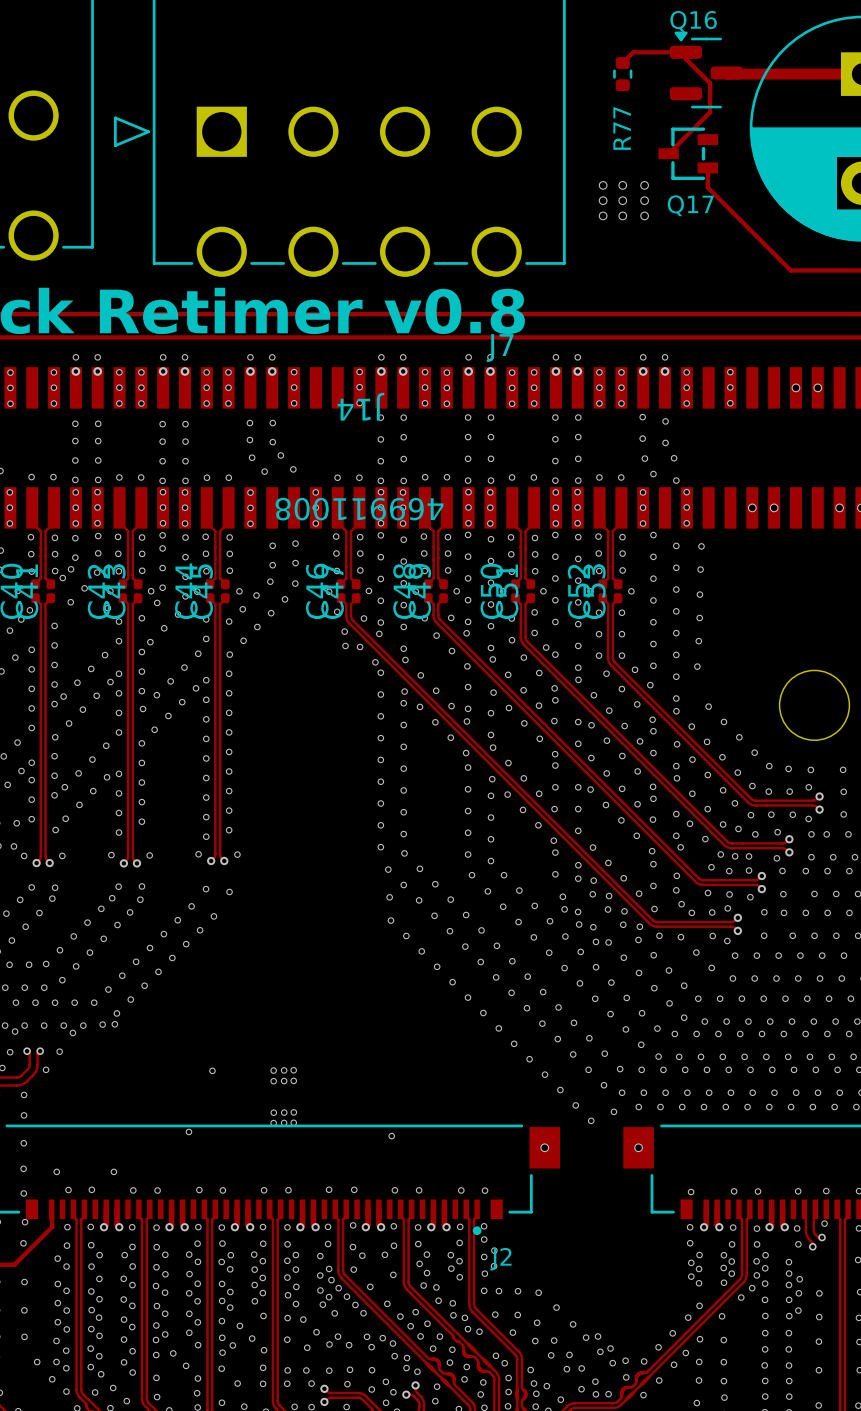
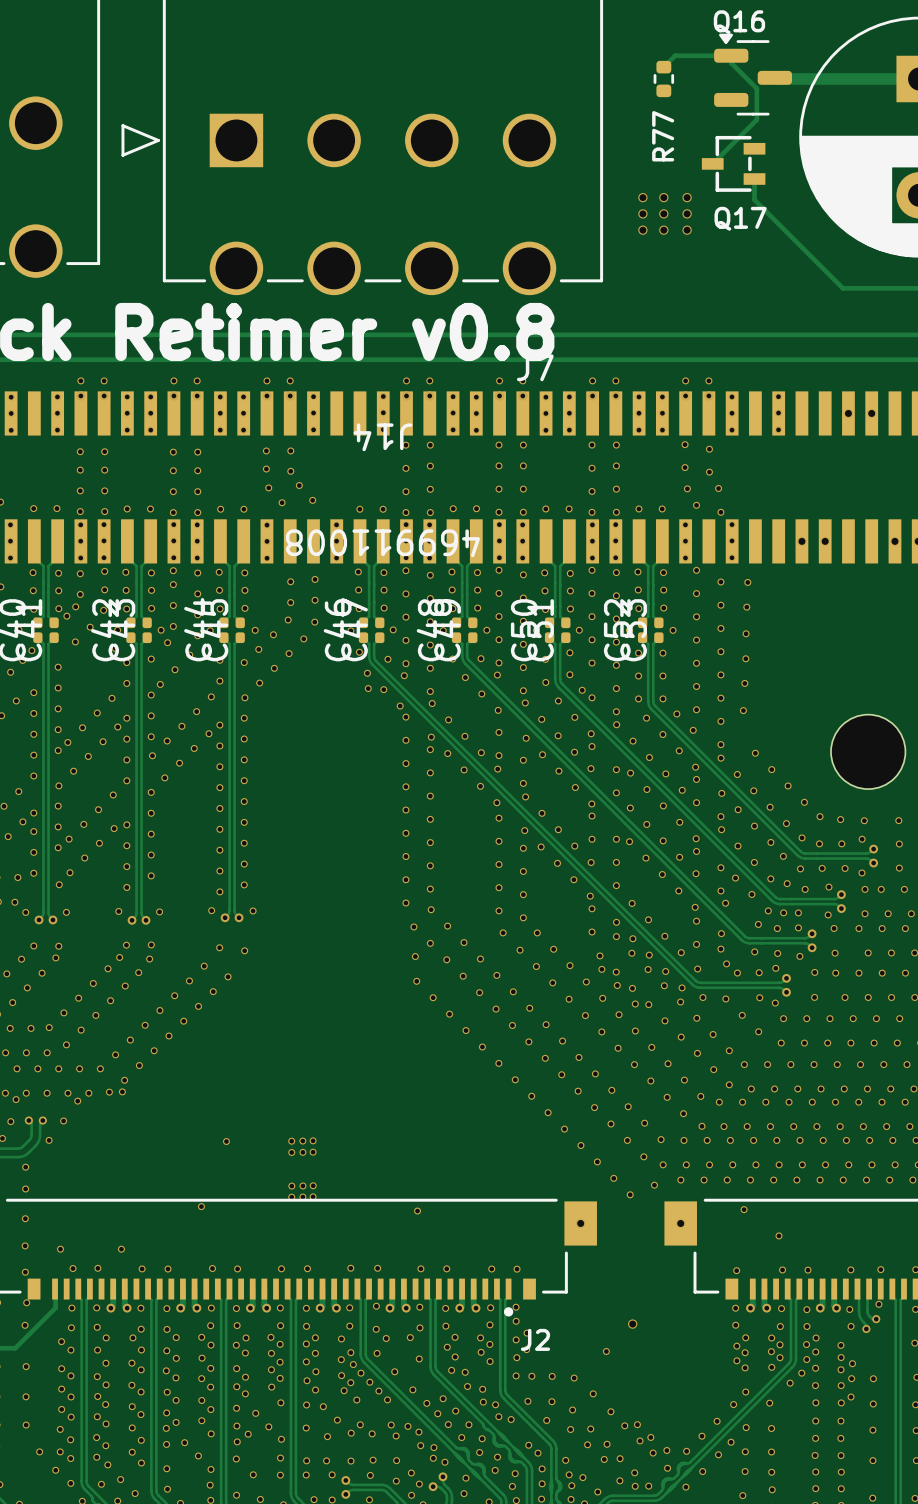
via: none -> (744, 1209)
via: none -> (778, 1235)
via: none -> (632, 1324)
via: none -> (606, 1351)

